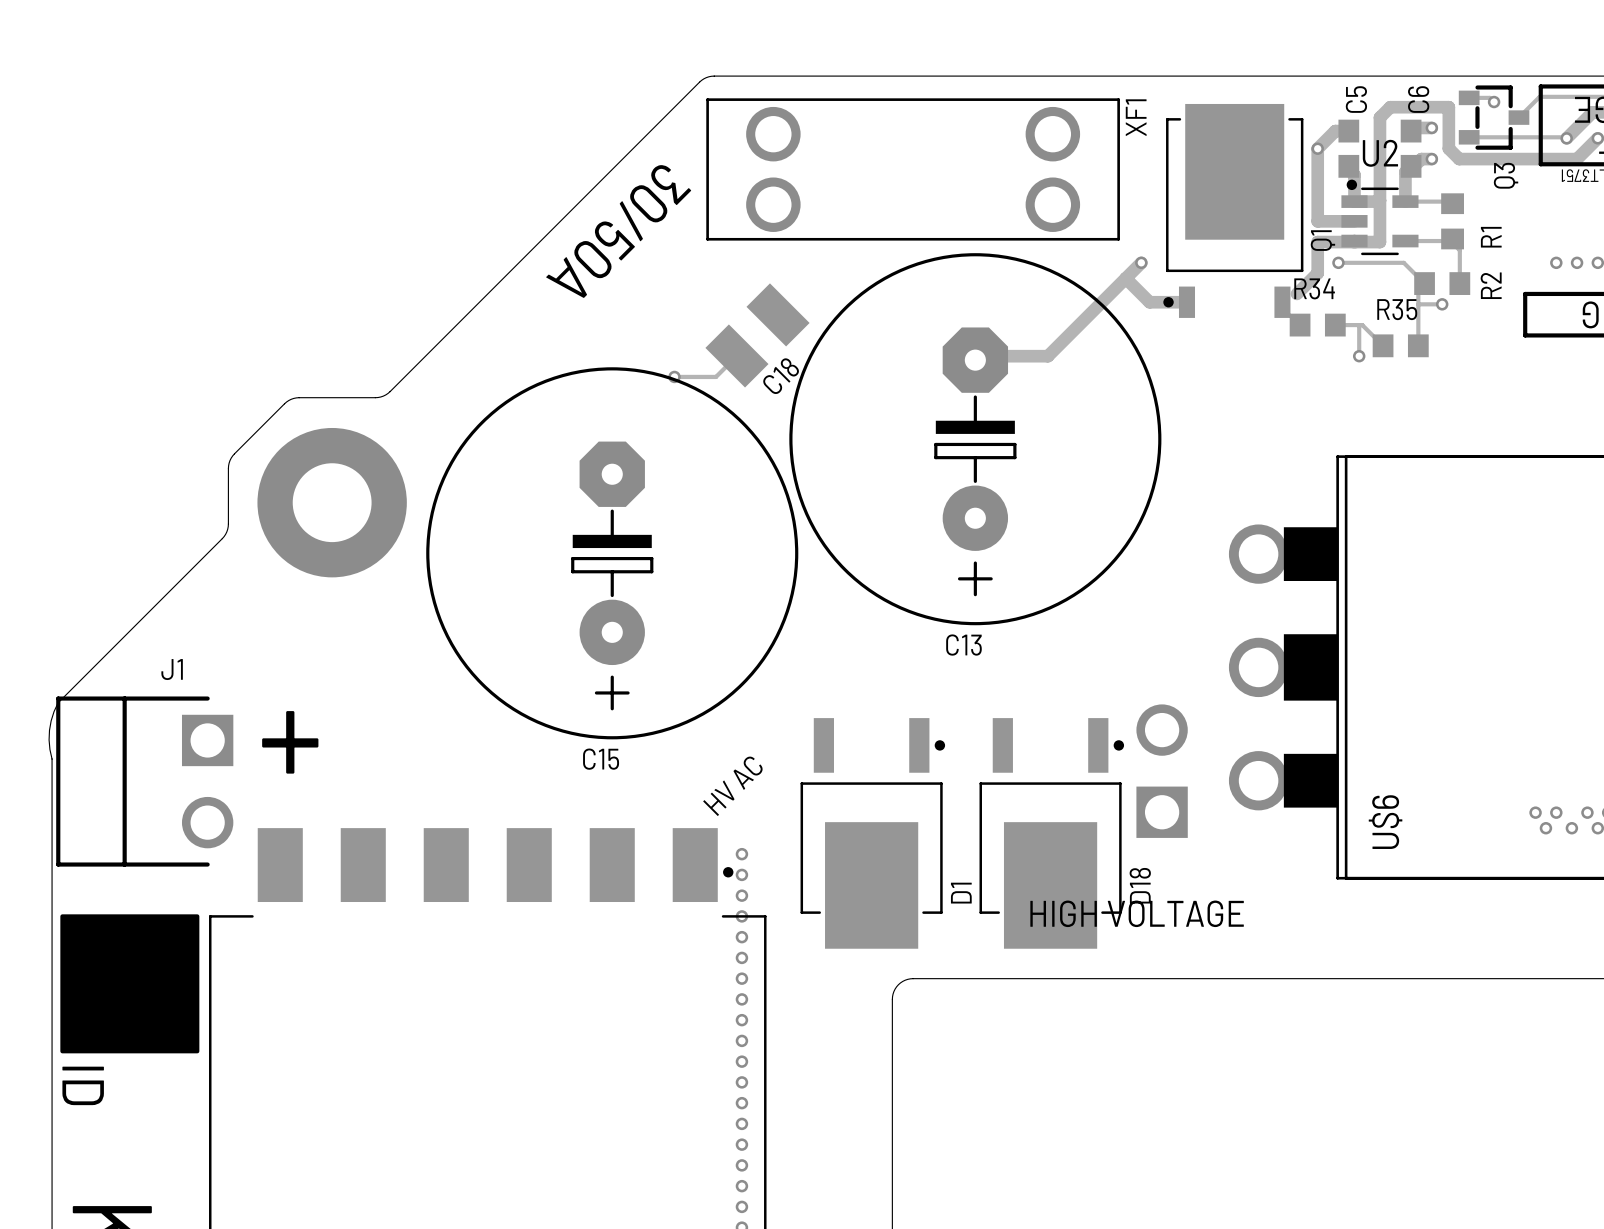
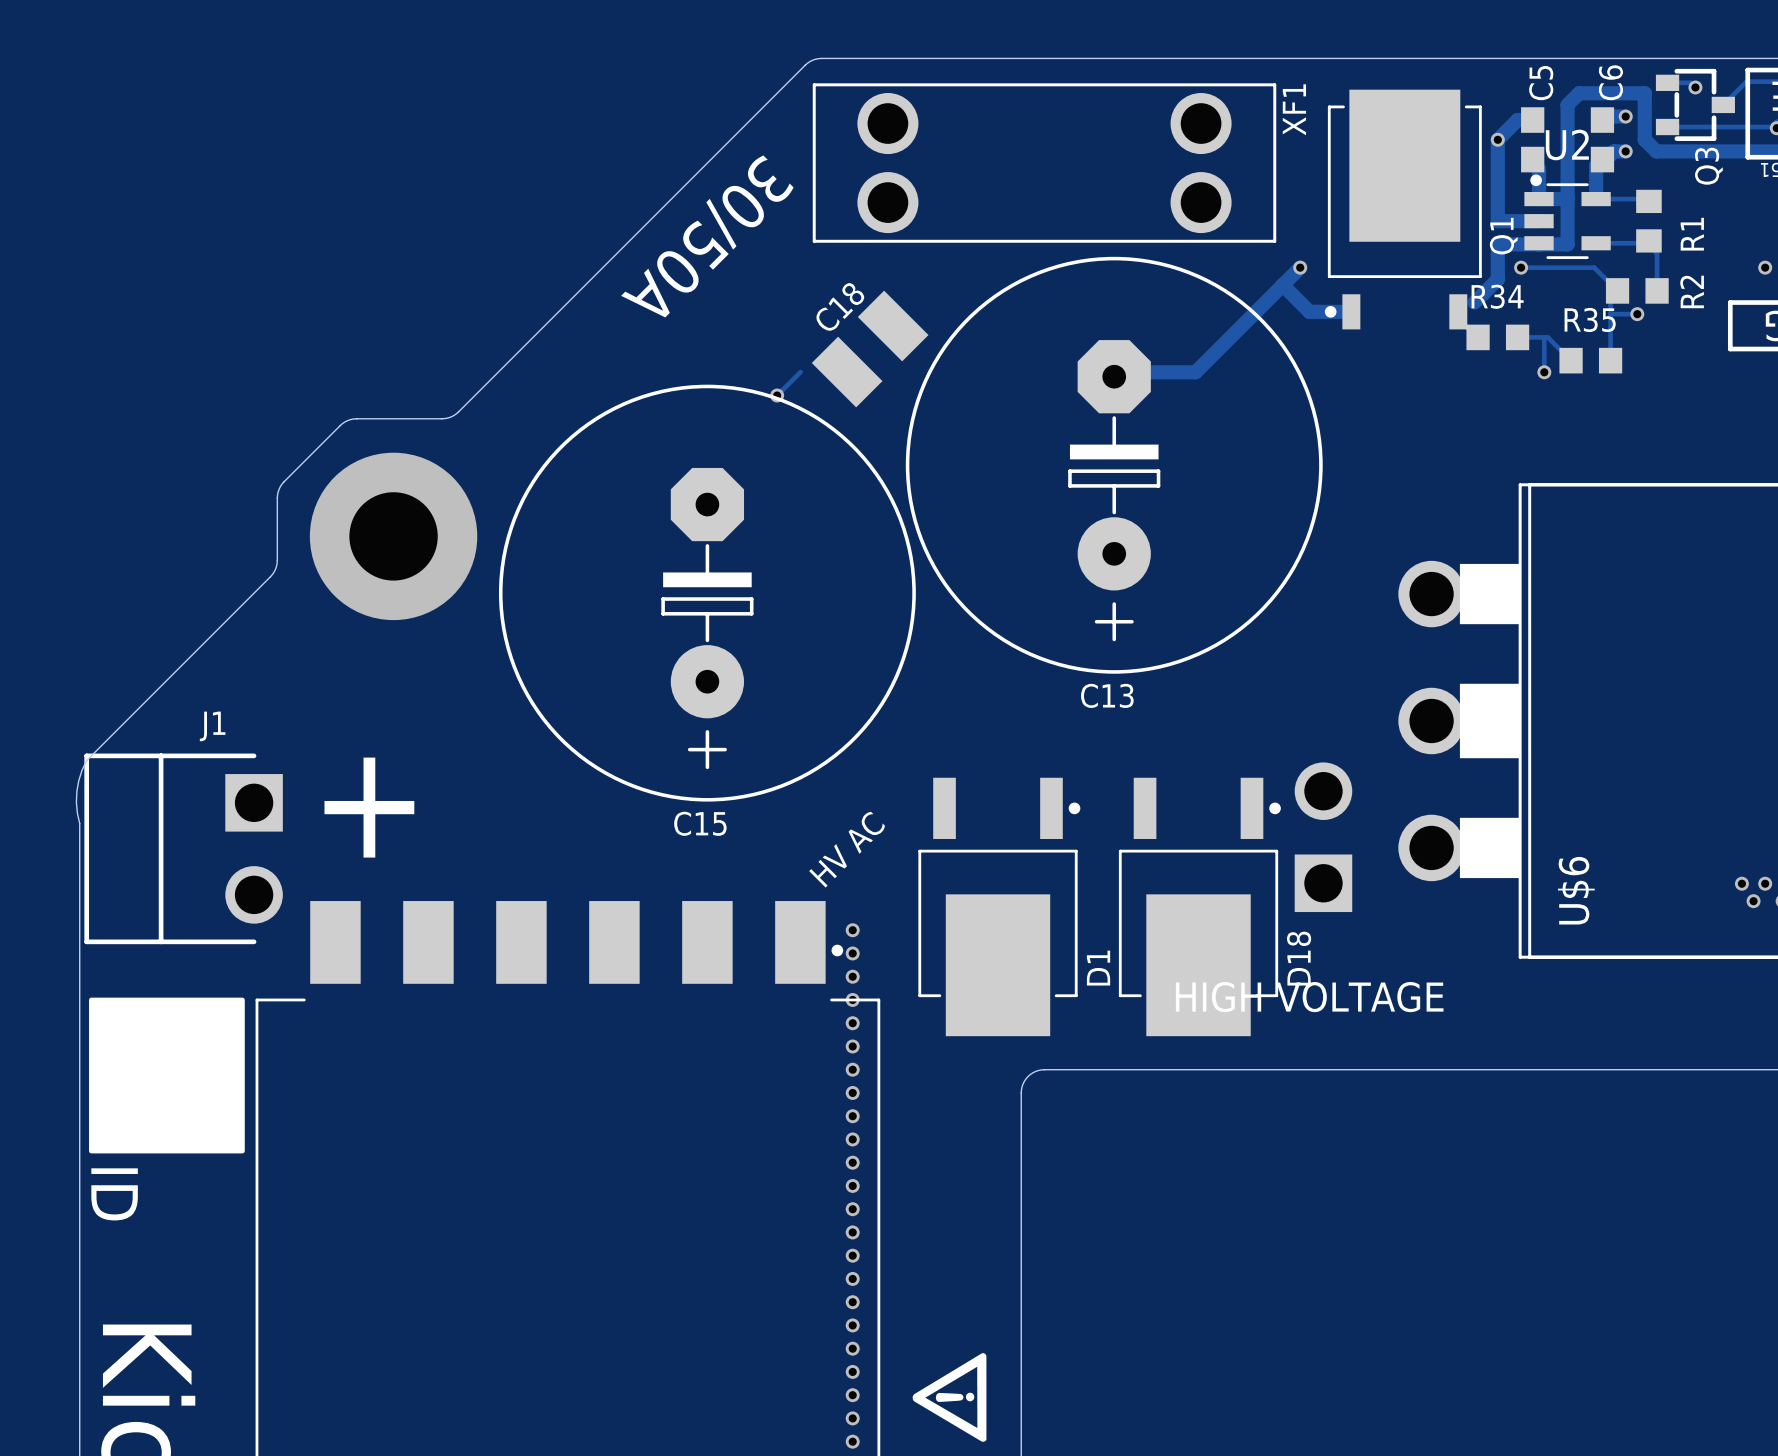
track: (736, 355) (716, 376) (674, 376) -> (800, 372) (777, 395)
C18 name position: C18 (781, 376) -> C18 (840, 307)

